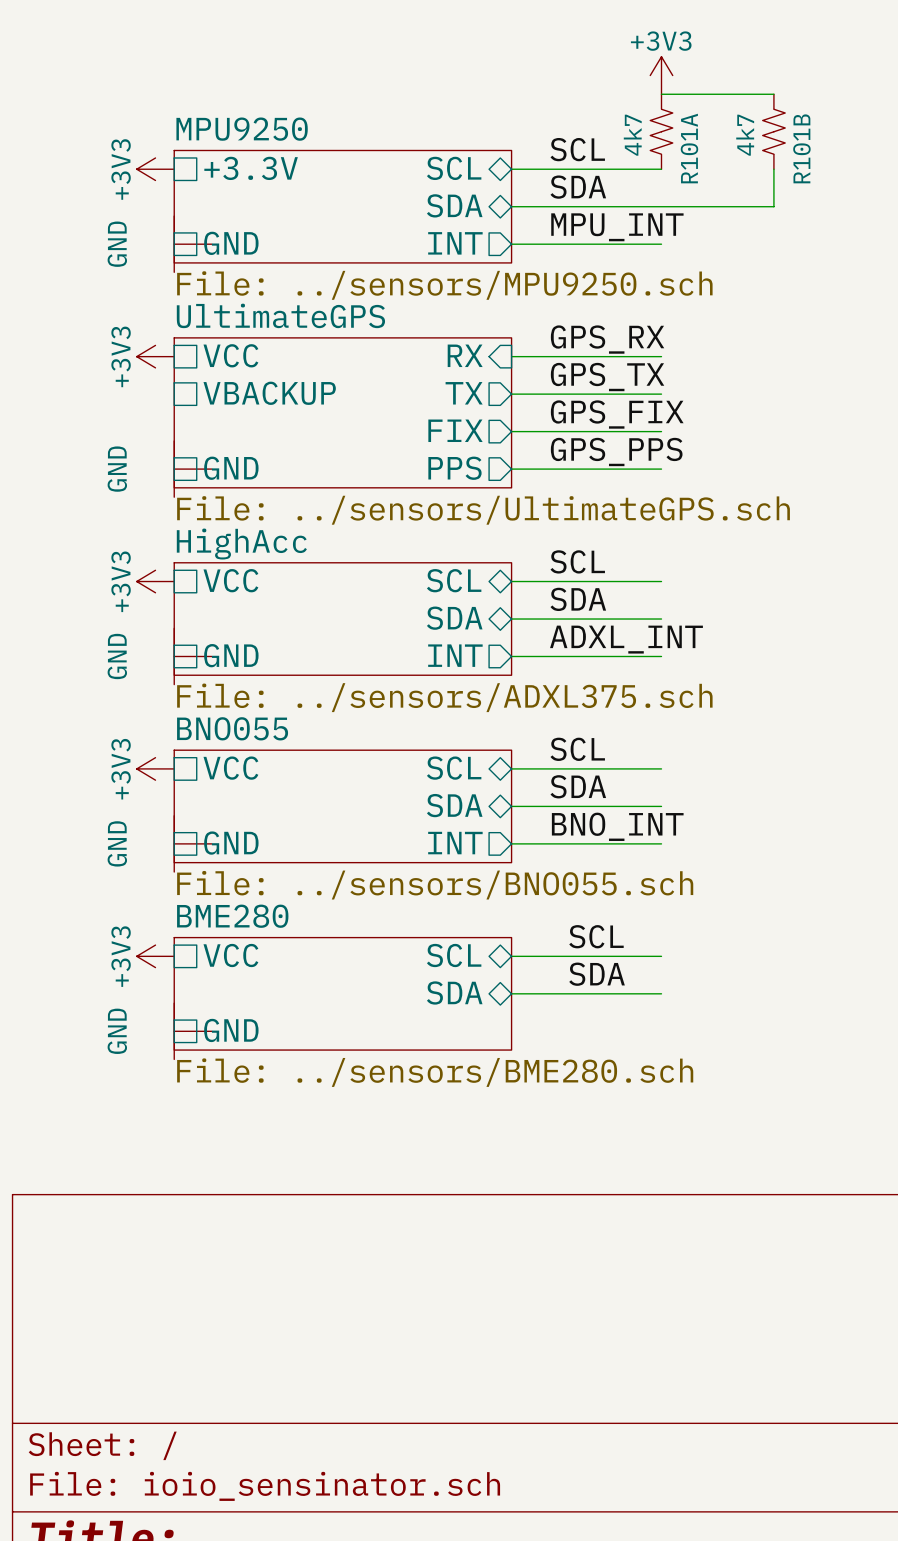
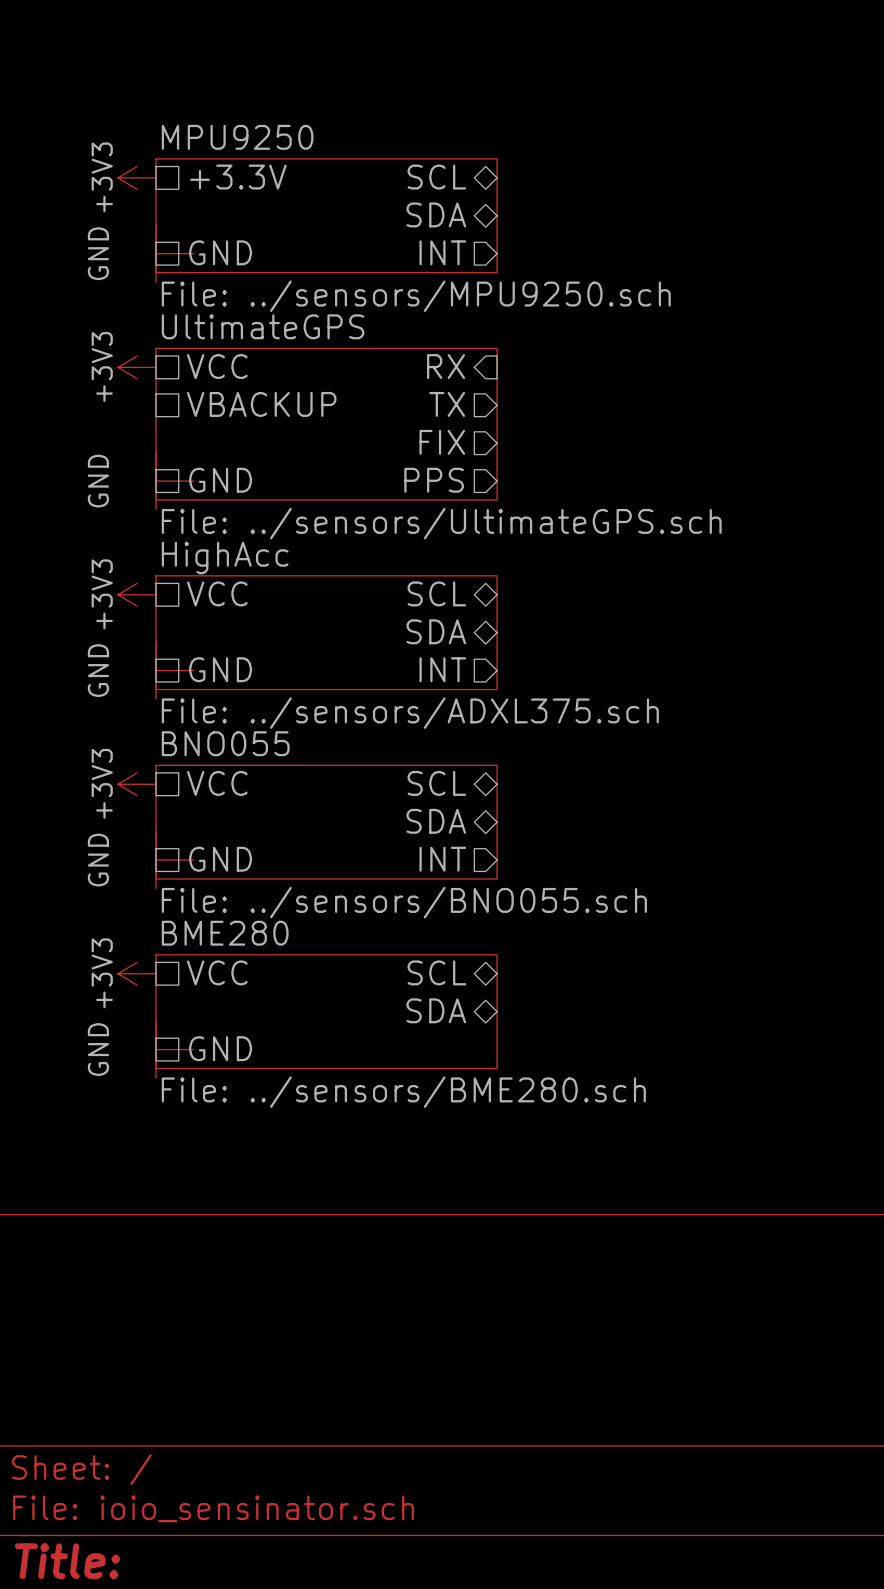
power symbol: +3V3 (661, 75) -> none
wire: (661, 94) (773, 94) -> none
R101A: 4k7 (661, 131) -> none
R101B: 4k7 (773, 131) -> none
label: SCL (577, 149) -> none
wire: (511, 169) (661, 169) -> none
wire: (773, 169) (773, 206) (511, 206) -> none
label: SDA (578, 187) -> none
label: MPU_INT (617, 227) -> none
wire: (511, 244) (661, 244) -> none
label: GPS_RX (607, 339) -> none
wire: (511, 356) (661, 356) -> none
label: GPS_TX (607, 377) -> none
wire: (511, 394) (661, 394) -> none
label: GPS_FIX (617, 414) -> none
wire: (511, 431) (661, 431) -> none
label: GPS_PPS (616, 451) -> none
wire: (511, 469) (661, 469) -> none
label: SCL (577, 561) -> none
wire: (511, 581) (661, 581) -> none
label: SDA (578, 599) -> none
wire: (511, 619) (661, 619) -> none
label: ADXL_INT (626, 639) -> none
wire: (511, 656) (661, 656) -> none
label: SCL (577, 749) -> none
wire: (511, 768) (661, 768) -> none
label: SDA (578, 786) -> none
wire: (511, 806) (661, 806) -> none
label: BNO_INT (617, 826) -> none
wire: (511, 843) (661, 843) -> none
label: SCL (596, 936) -> none
wire: (511, 956) (661, 956) -> none
label: SDA (597, 974) -> none
wire: (511, 993) (661, 993) -> none

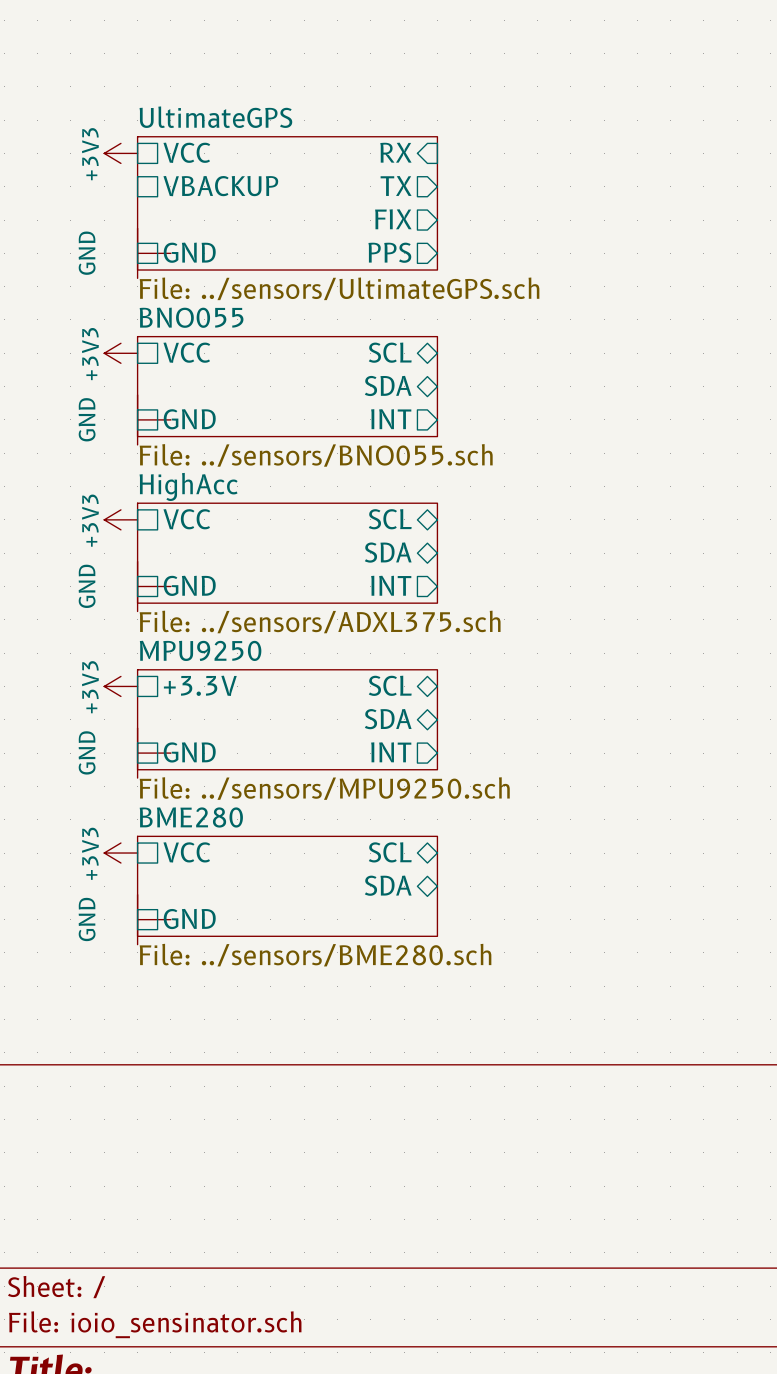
sheet pin: +3.3V (238, 177) -> VCC (186, 152)
sheet pin shape: bidirectional (436, 177) -> input (395, 152)
sheet pin: SCL (436, 177) -> RX (395, 152)
sheet pin: none -> VBACKUP (220, 186)
sheet pin shape: bidirectional (436, 214) -> output (396, 185)
sheet pin: SDA (436, 214) -> TX (396, 185)
sheet MPU9250: File: ../sensors/MPU9250.sch (326, 215) -> none
sheet pin position: GND (220, 252) -> GND (189, 252)
sheet pin: INT (442, 252) -> FIX (393, 219)
power symbol position: GND (174, 253) -> GND (154, 253)
sheet pin: none -> PPS (389, 252)
sheet pin: VCC (217, 366) -> none
sheet pin: RX (446, 366) -> none
power symbol position: +3V3 (137, 367) -> +3V3 (120, 353)
sheet pin: VBACKUP (261, 404) -> VCC (186, 352)
sheet pin shape: output (447, 404) -> bidirectional (390, 352)
sheet pin: TX (447, 404) -> SCL (390, 352)
sheet UltimateGPS position: (326, 424) -> (287, 203)
sheet pin shape: output (442, 442) -> bidirectional (388, 385)
sheet pin: FIX (442, 442) -> SDA (388, 385)
sheet BNO055: none -> File: ../sensors/BNO055.sch (287, 386)
sheet pin: PPS (434, 480) -> INT (391, 419)
sheet BNO055 name: BNO055 (225, 743) -> MPU9250 (200, 650)
sheet pin: VCC (217, 783) -> +3.3V (200, 685)
sheet BNO055 value: File: ../sensors/BNO055.sch (404, 902) -> File: ../sensors/MPU9250.sch (324, 788)

